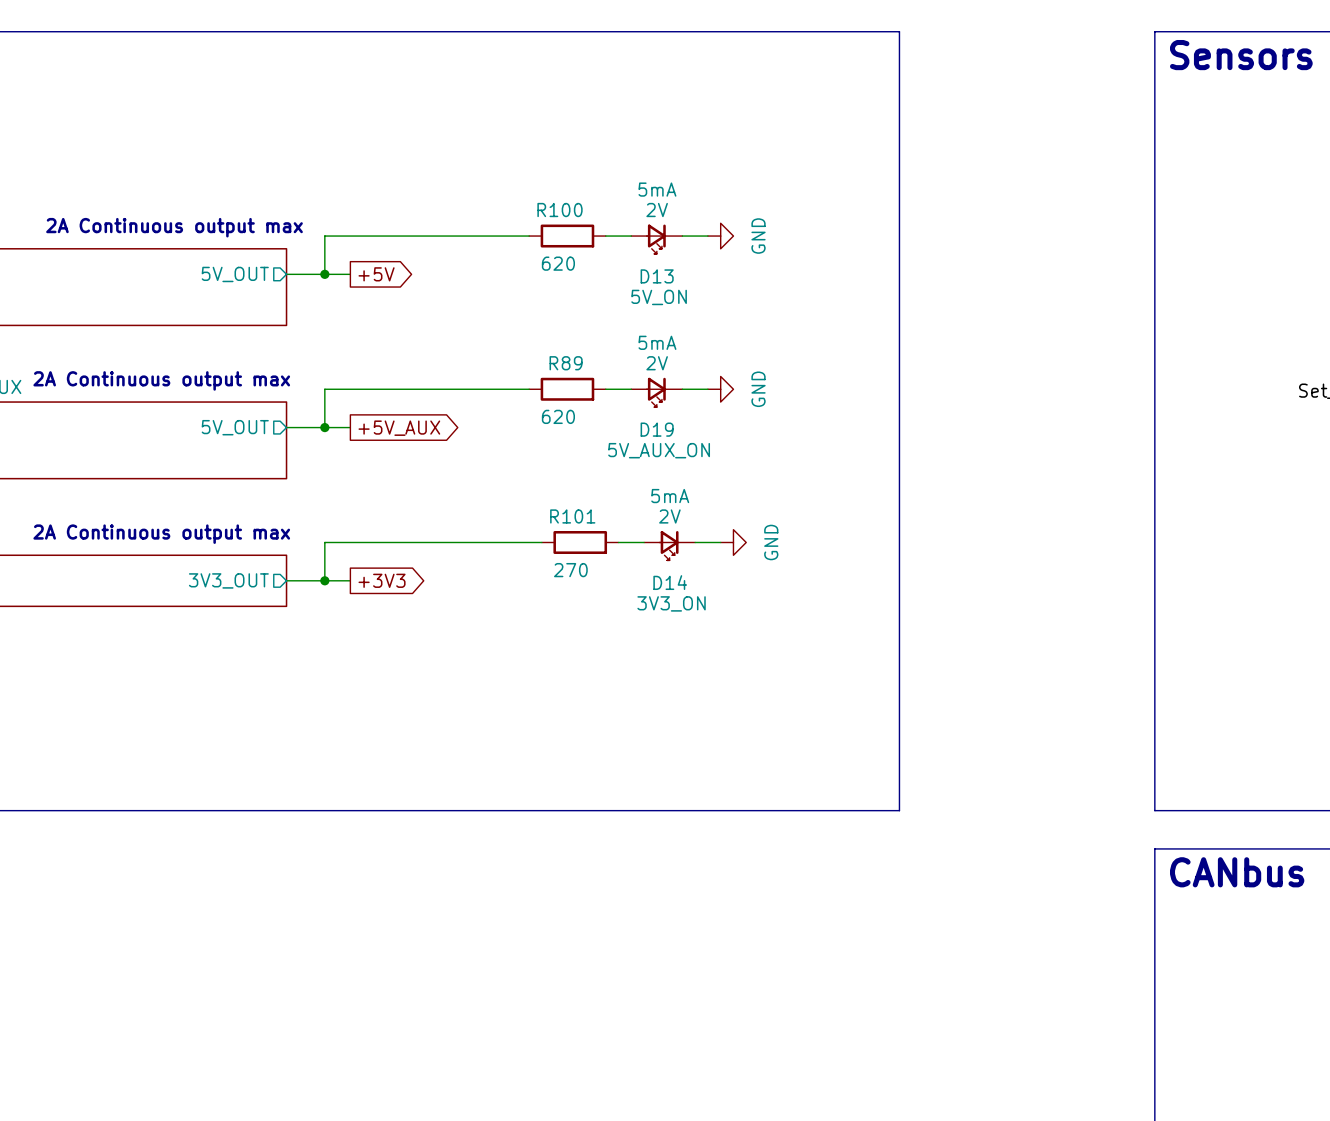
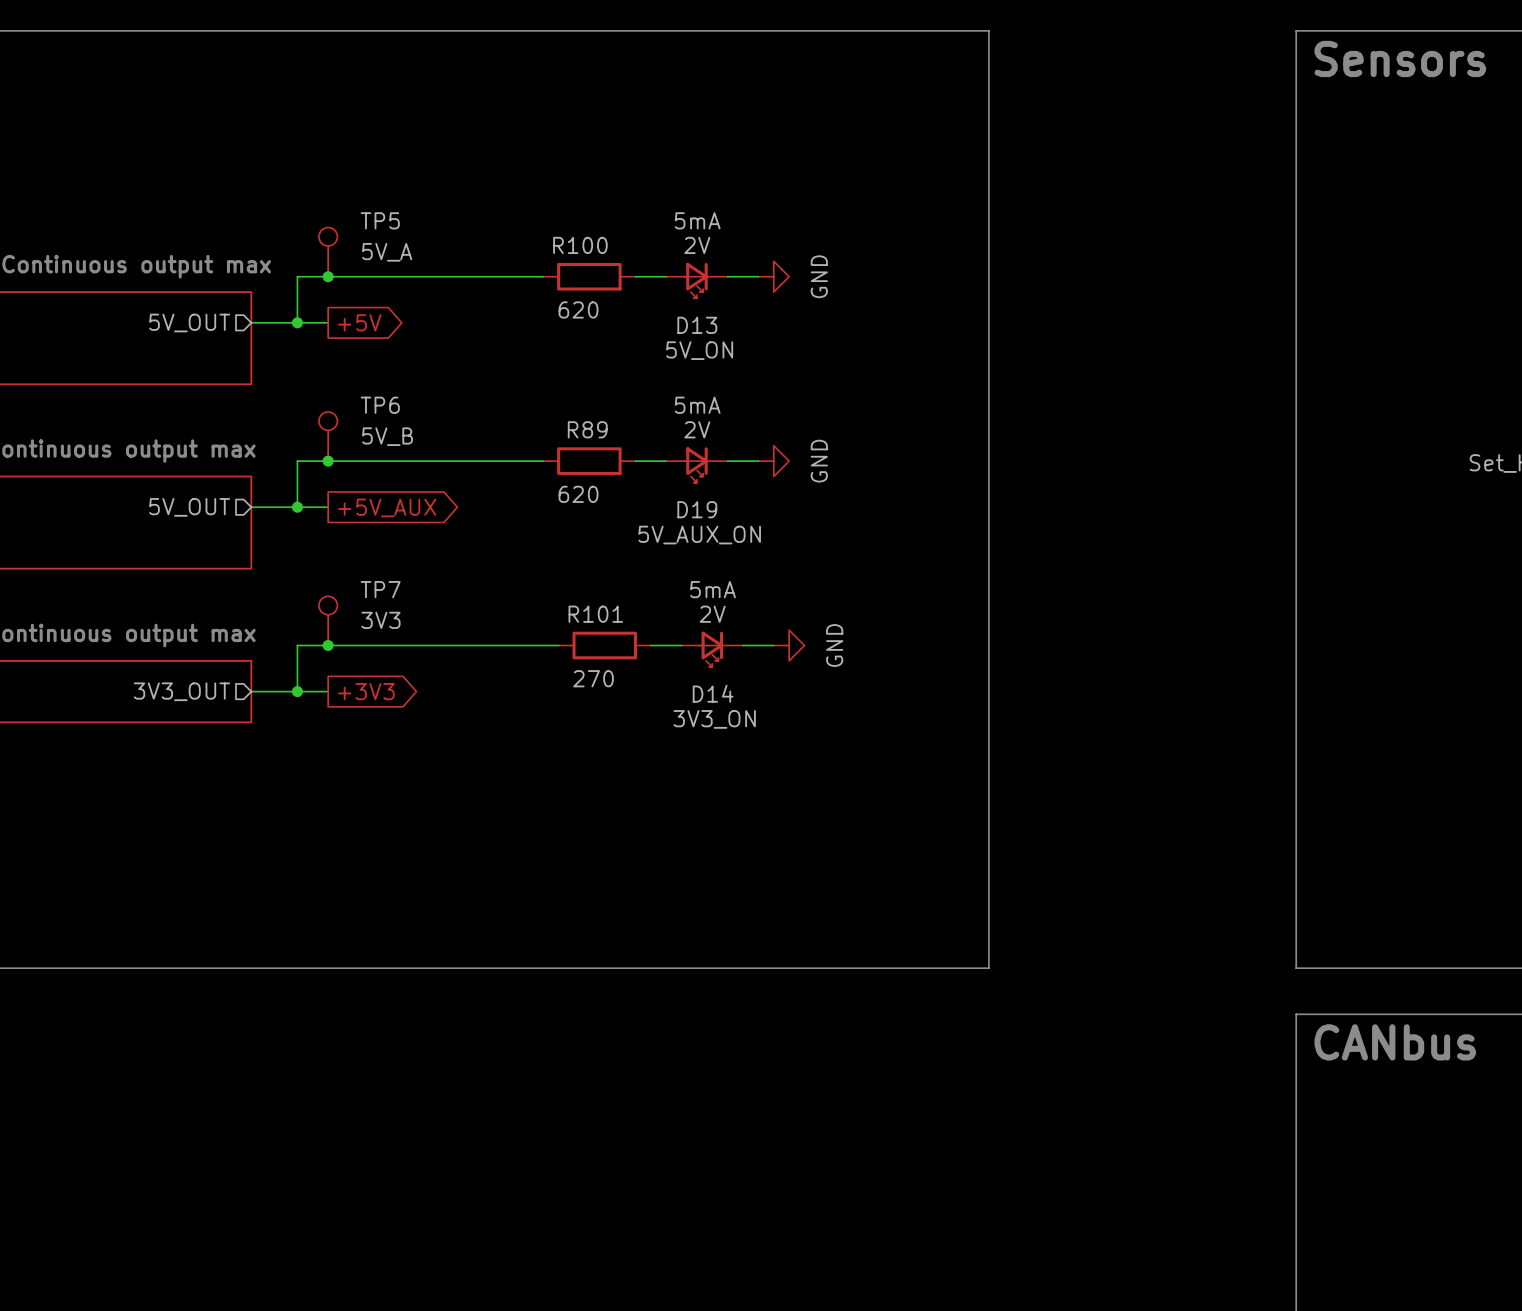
TP5: none -> 5V_A (328, 252)
junction: none -> (328, 276)
TP6: none -> 5V_B (328, 436)
junction: none -> (328, 461)
TP7: none -> 3V3 (328, 620)
junction: none -> (328, 645)

